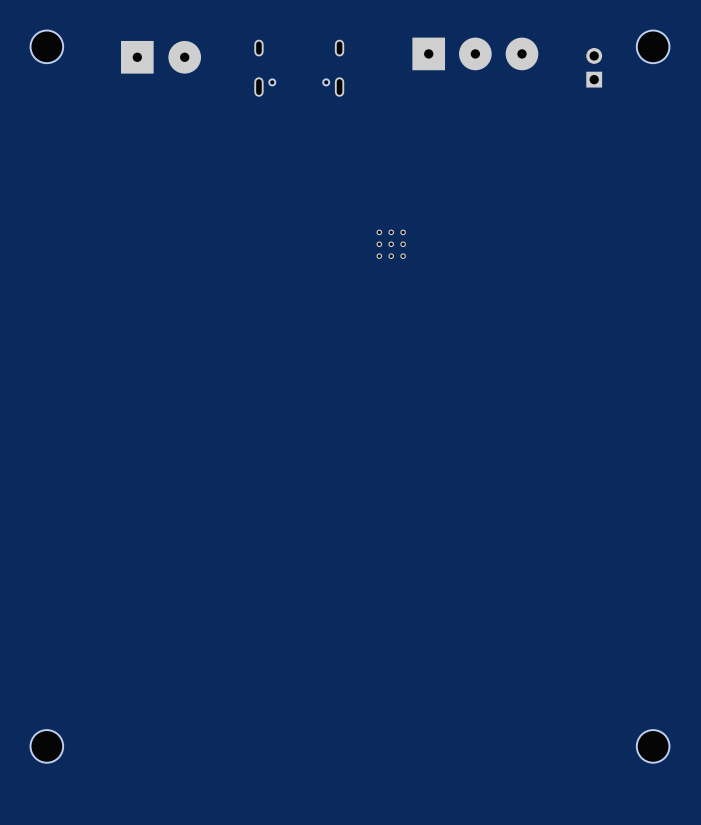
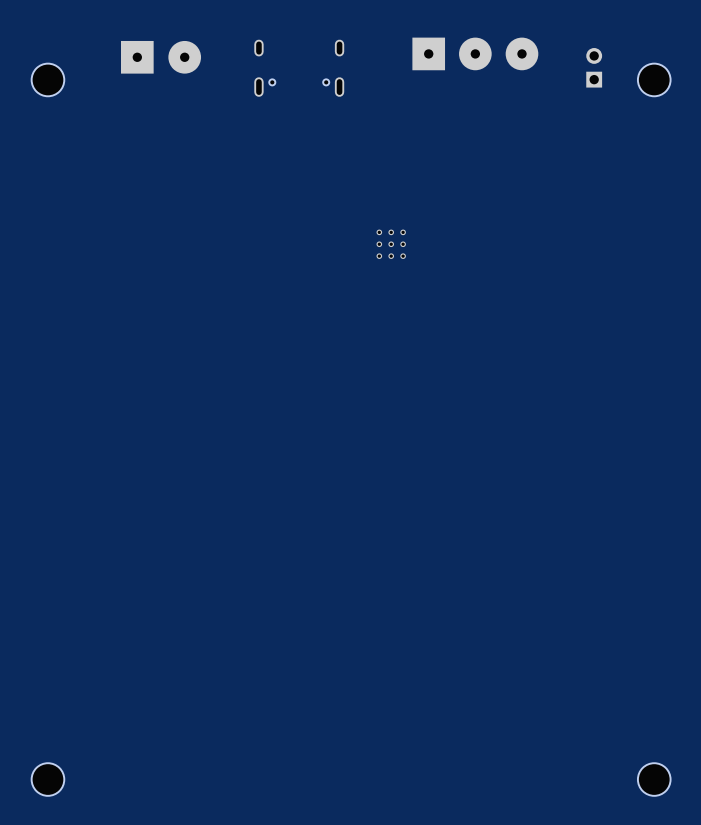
part position: (46, 46) -> (47, 79)
part position: (653, 46) -> (654, 79)
part position: (46, 746) -> (47, 779)
part position: (653, 746) -> (654, 779)

